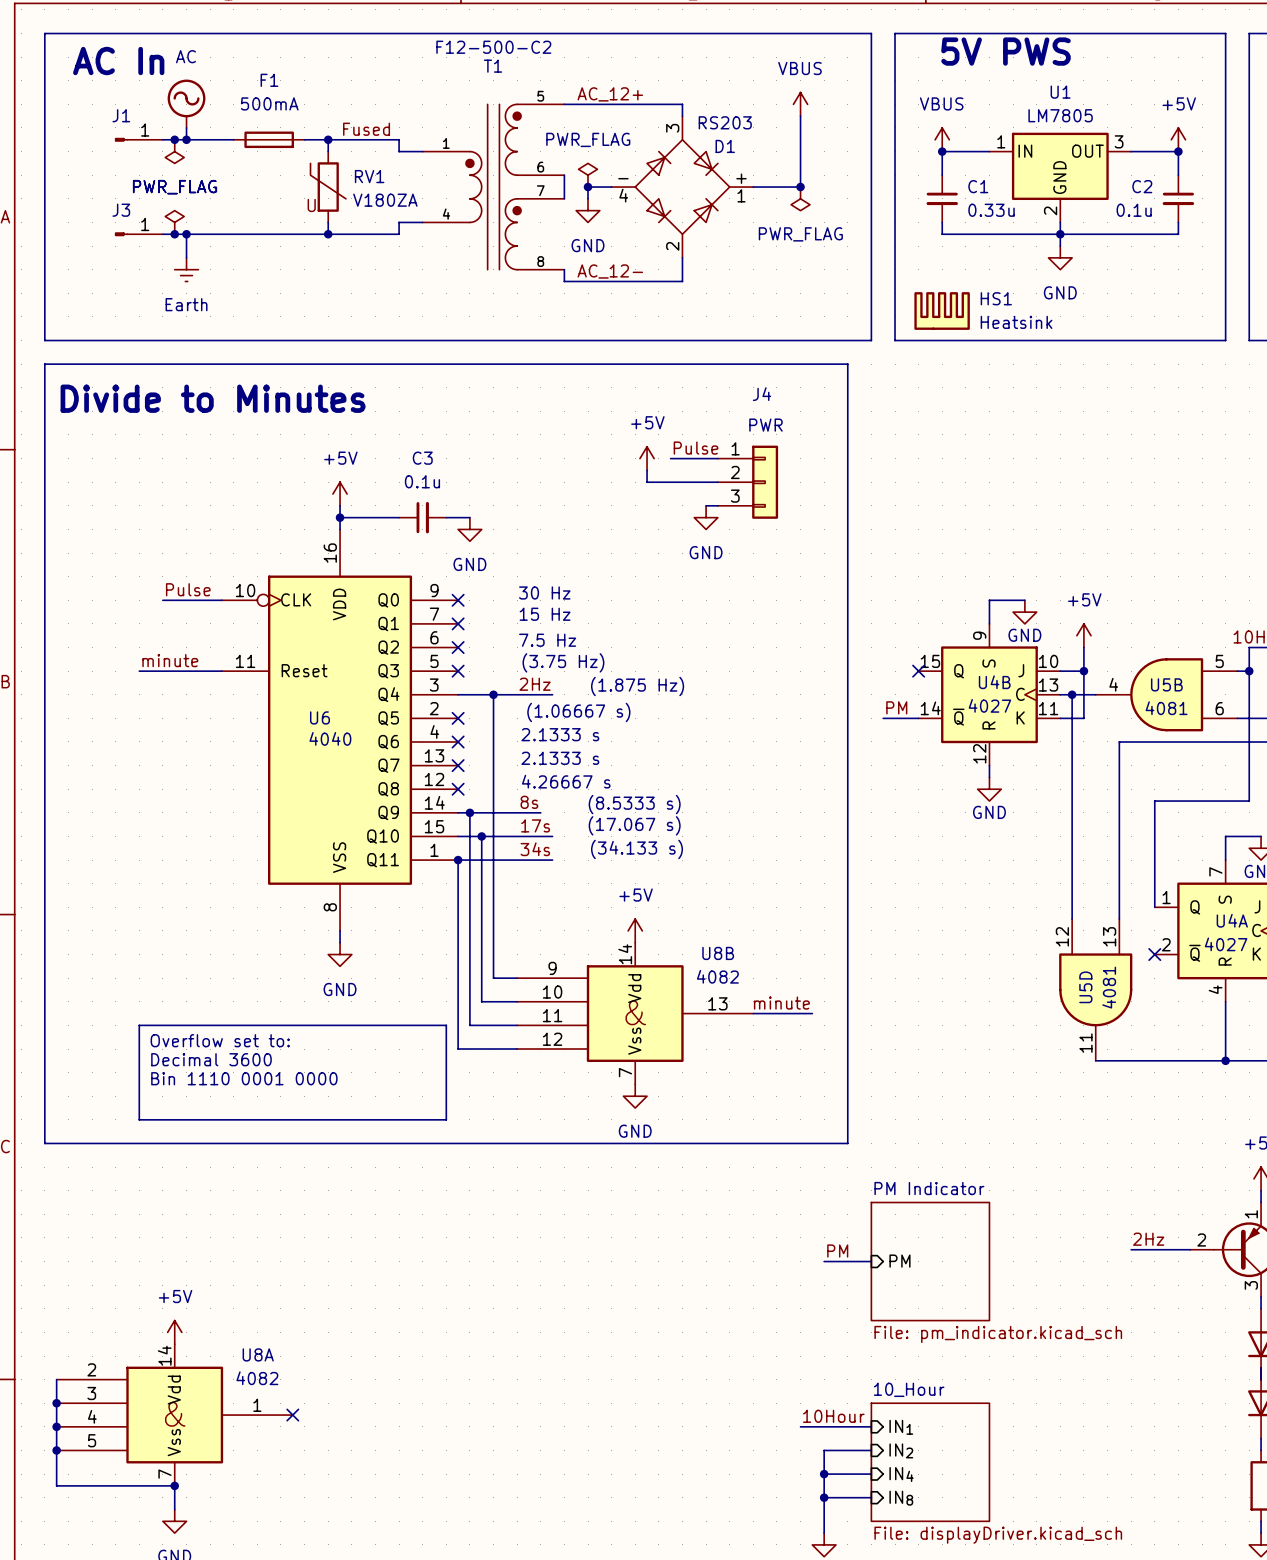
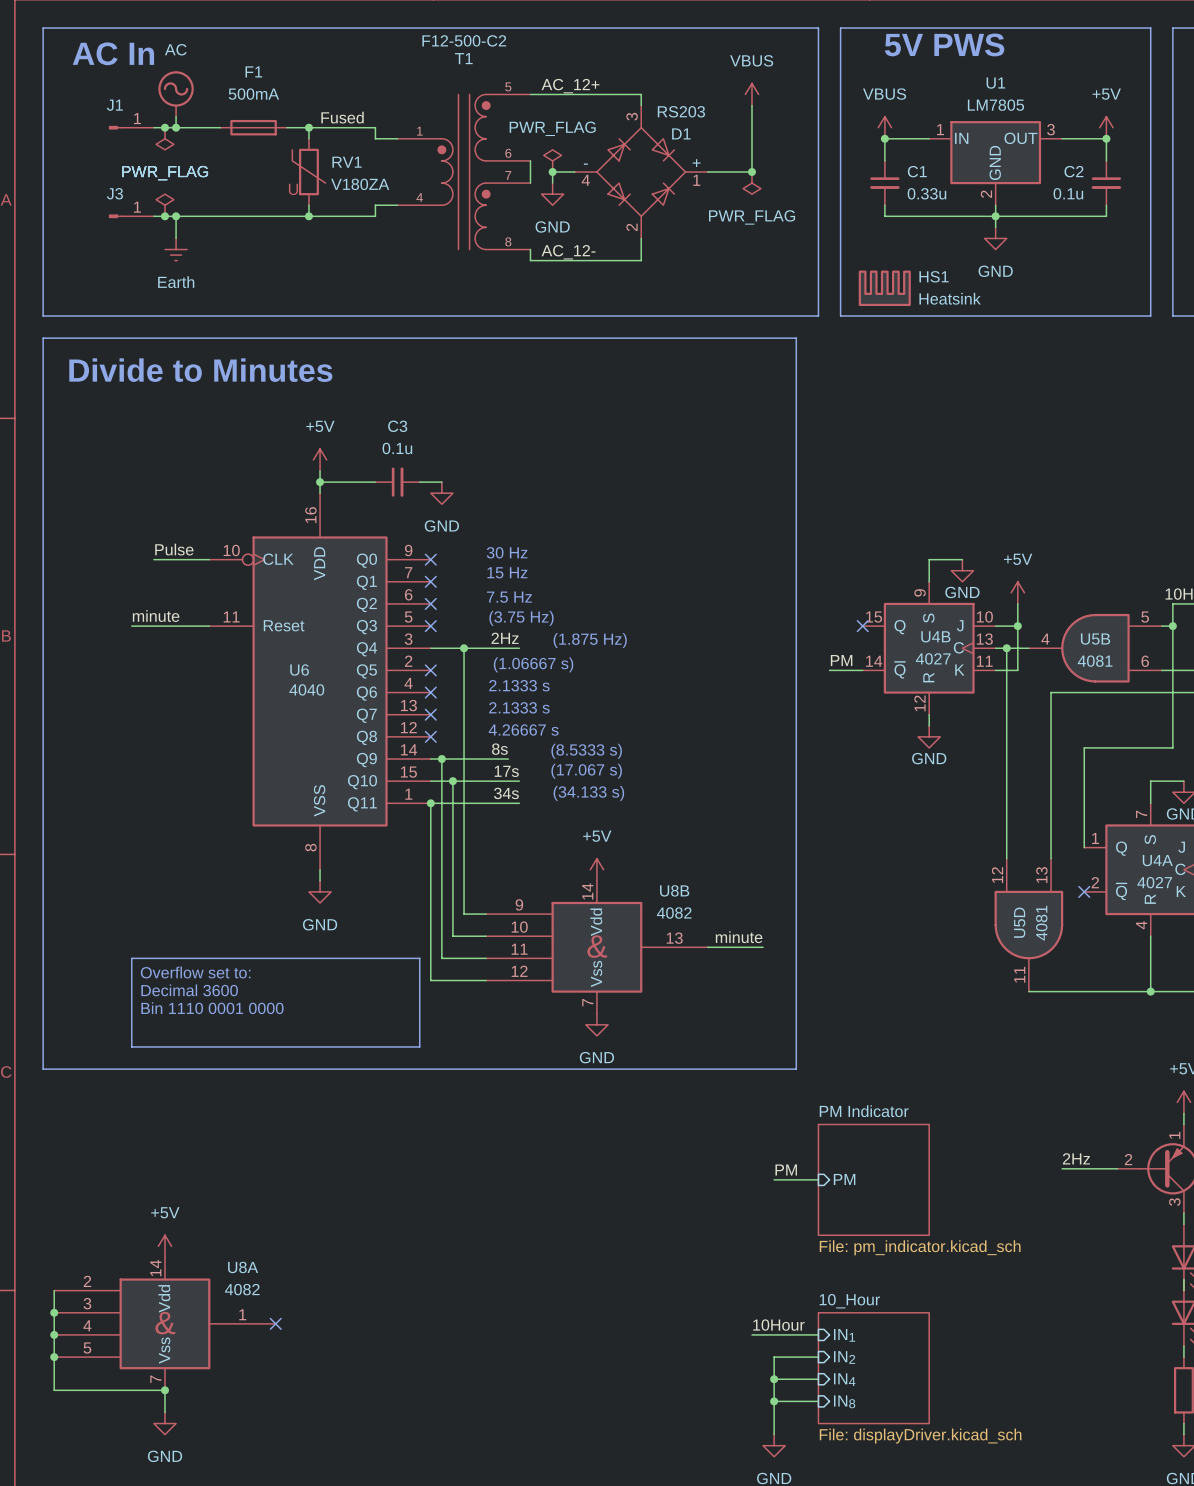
label: Pulse (696, 448) -> none
power symbol: +5V (647, 458) -> none
wire: (670, 458) (717, 458) -> none
wire: (647, 470) (647, 482) (717, 482) -> none
J4: PWR (747, 482) -> none
wire: (706, 505) (717, 505) -> none
power symbol: GND (706, 517) -> none

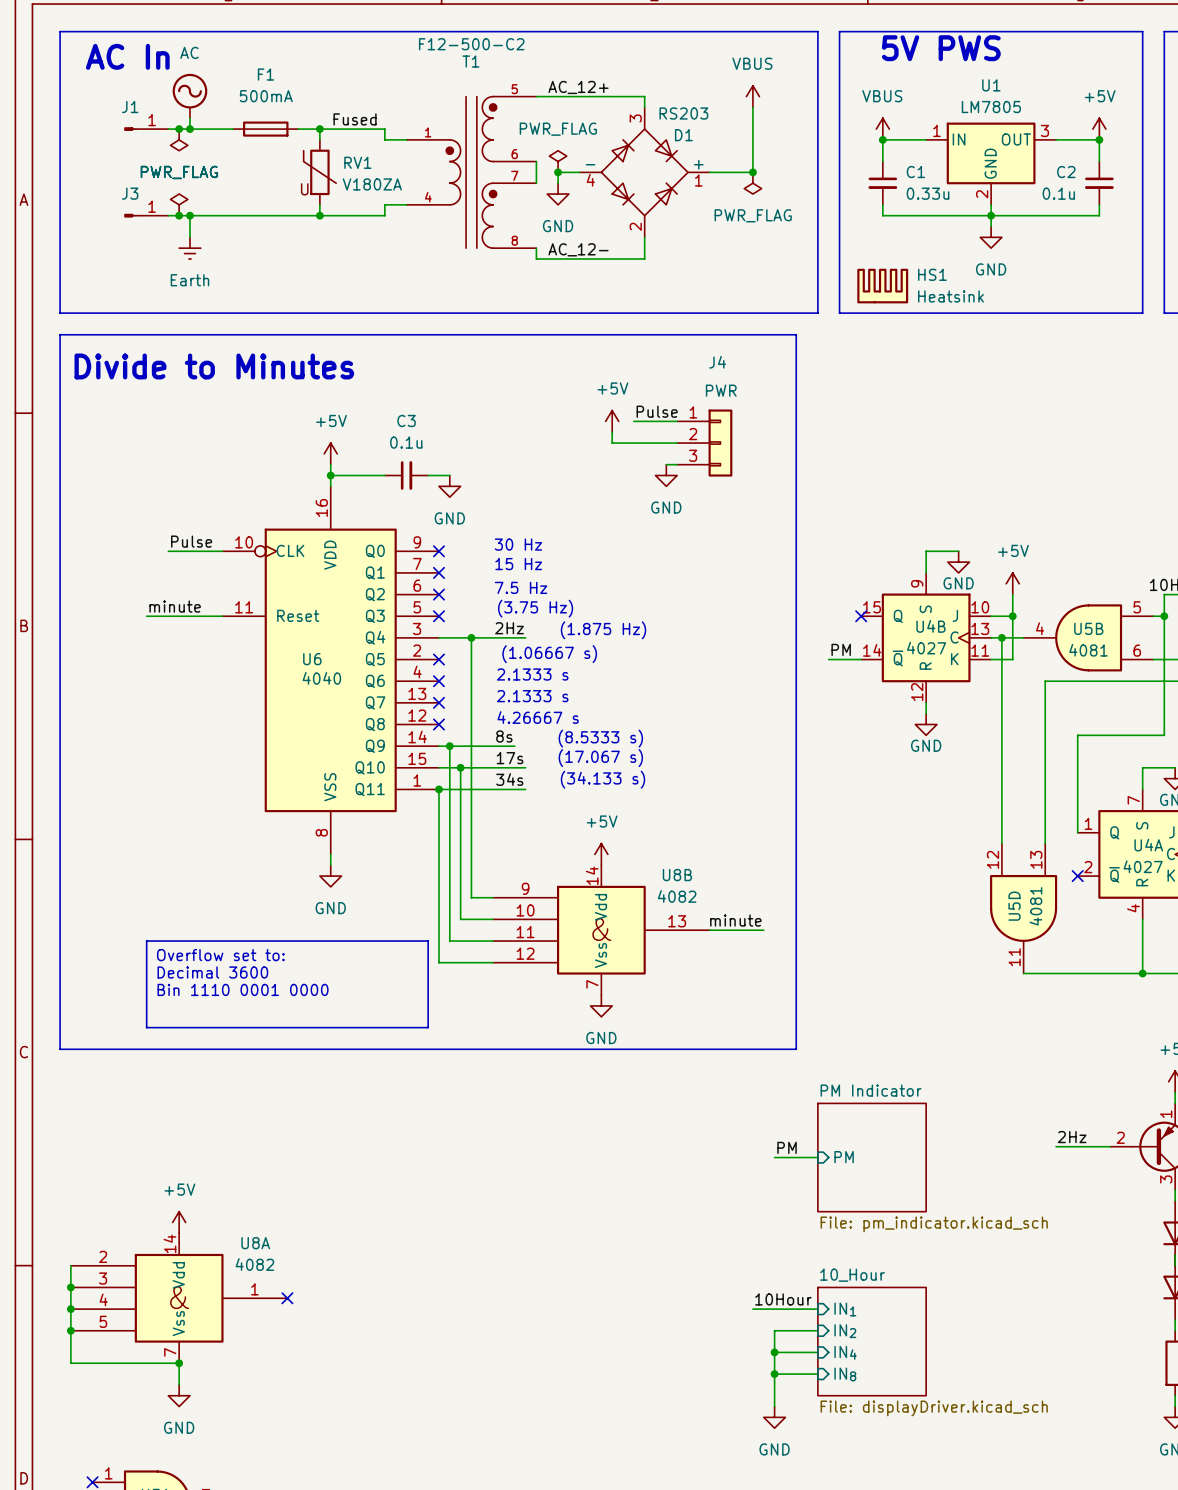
label: none -> Pulse (657, 411)
power symbol: none -> +5V (612, 421)
wire: none -> (633, 421) (677, 421)
wire: none -> (612, 432) (612, 443) (677, 443)
J4: none -> PWR (704, 443)
wire: none -> (666, 464) (677, 464)
power symbol: none -> GND (666, 475)

